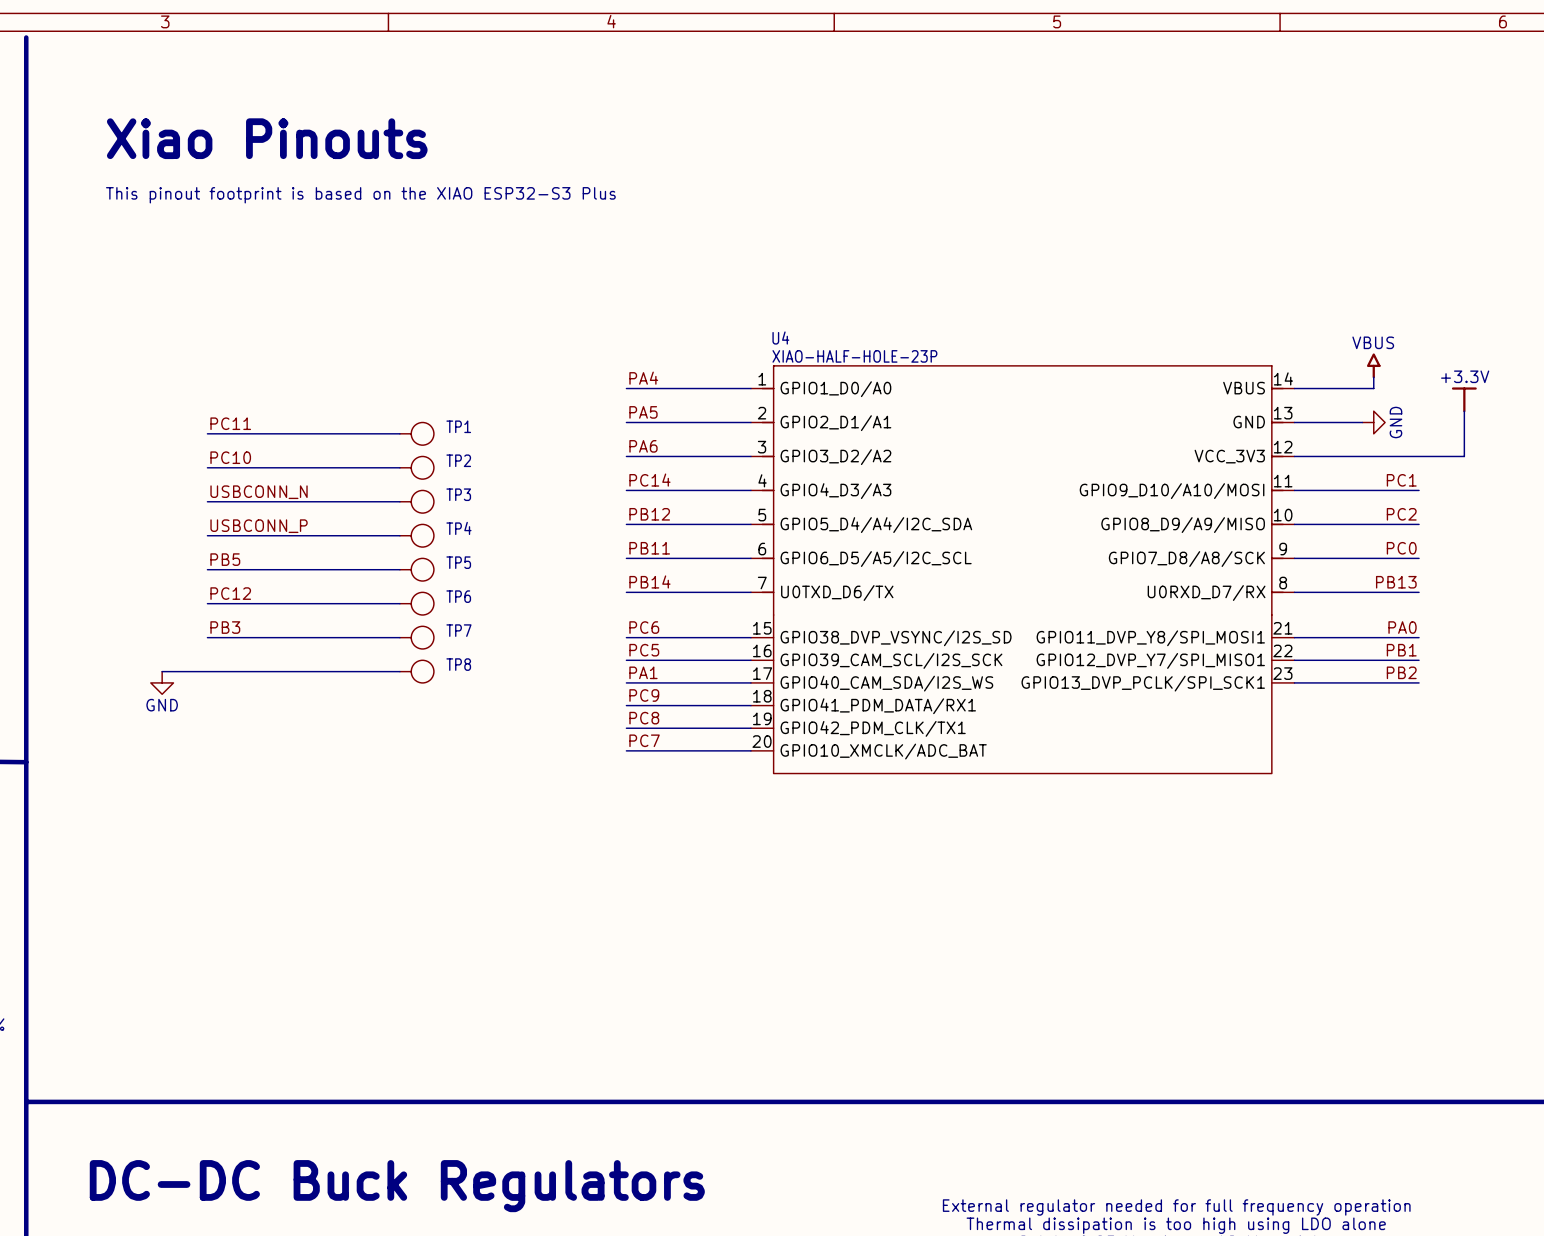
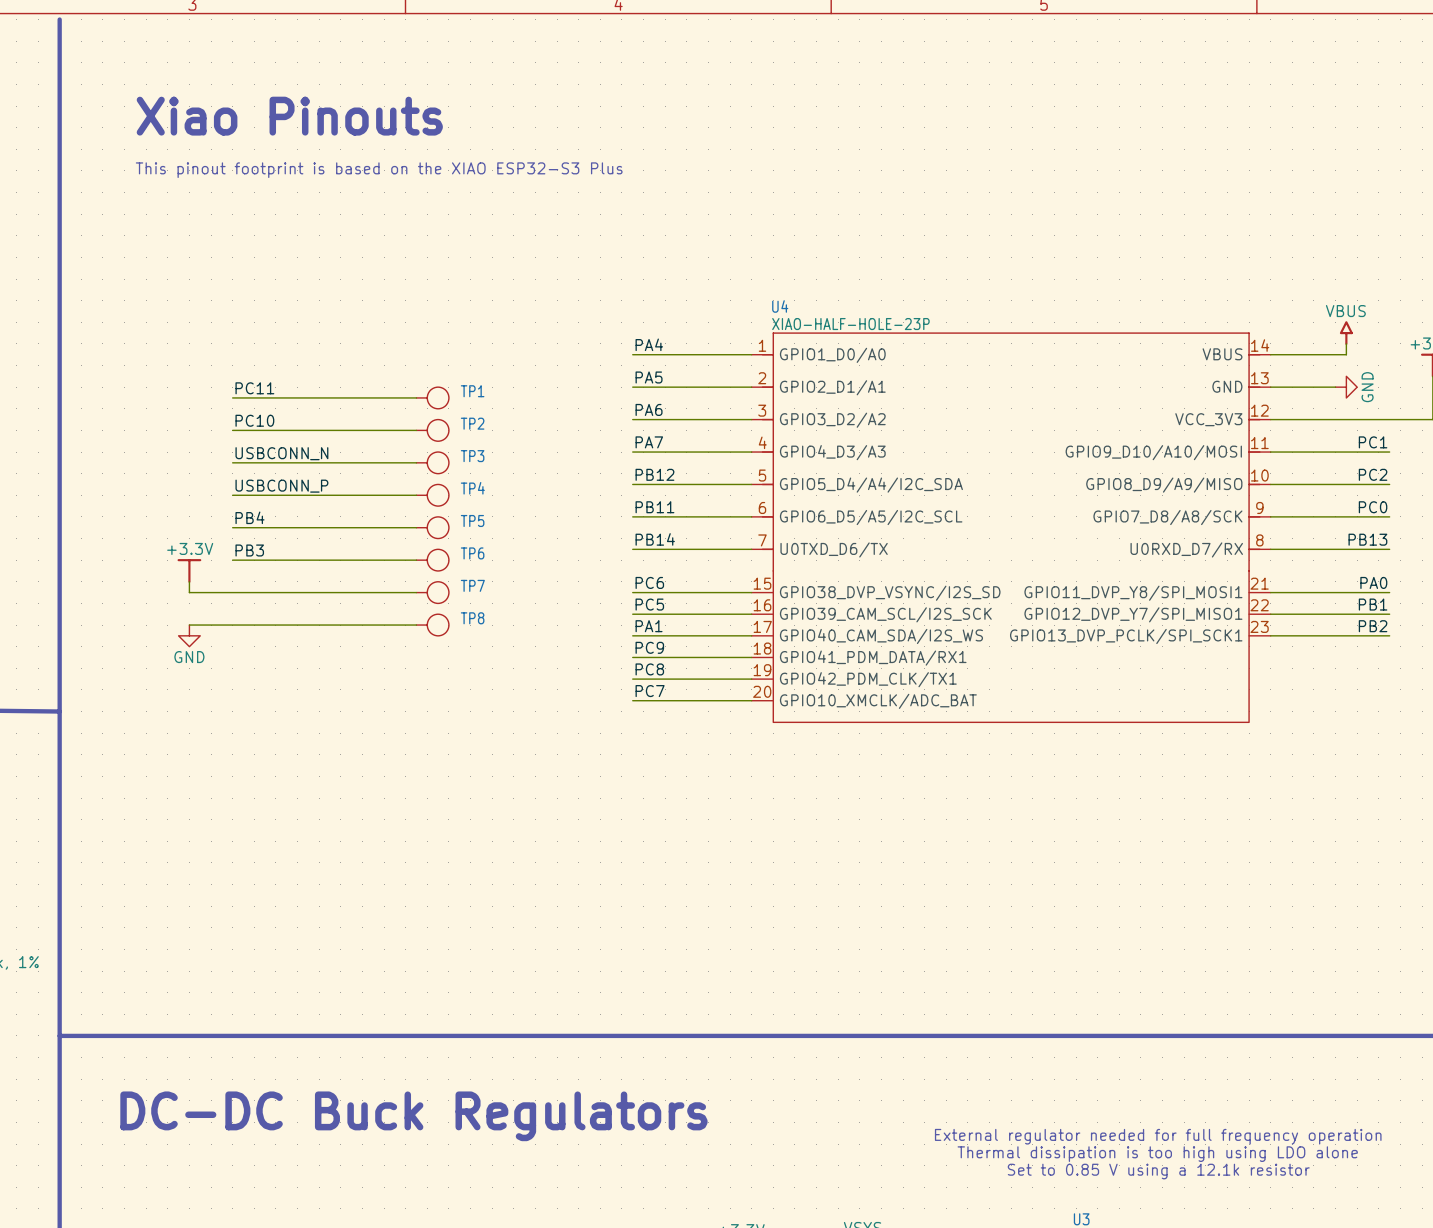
label: PC14 (649, 480) -> PA7 (649, 442)
label: PB5 (225, 559) -> PB4 (250, 517)
label: PC12 (230, 593) -> PB3 (249, 550)
power symbol: none -> +3.3V (189, 570)
wire: none -> (189, 581) (189, 592) (232, 592)
label: PB3 (225, 627) -> none

